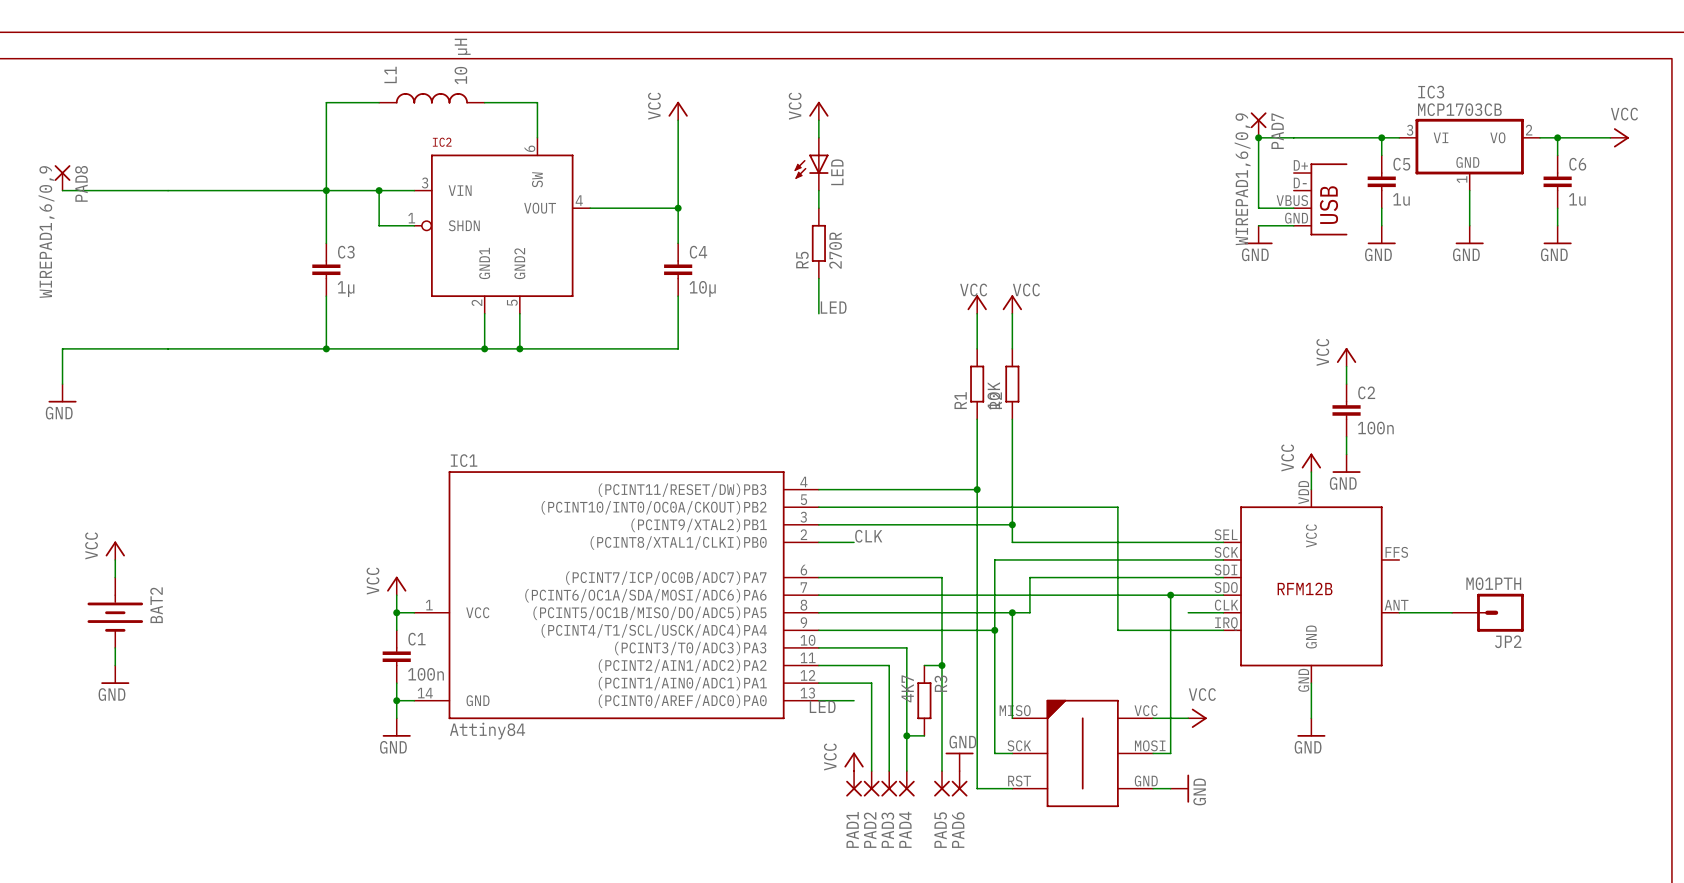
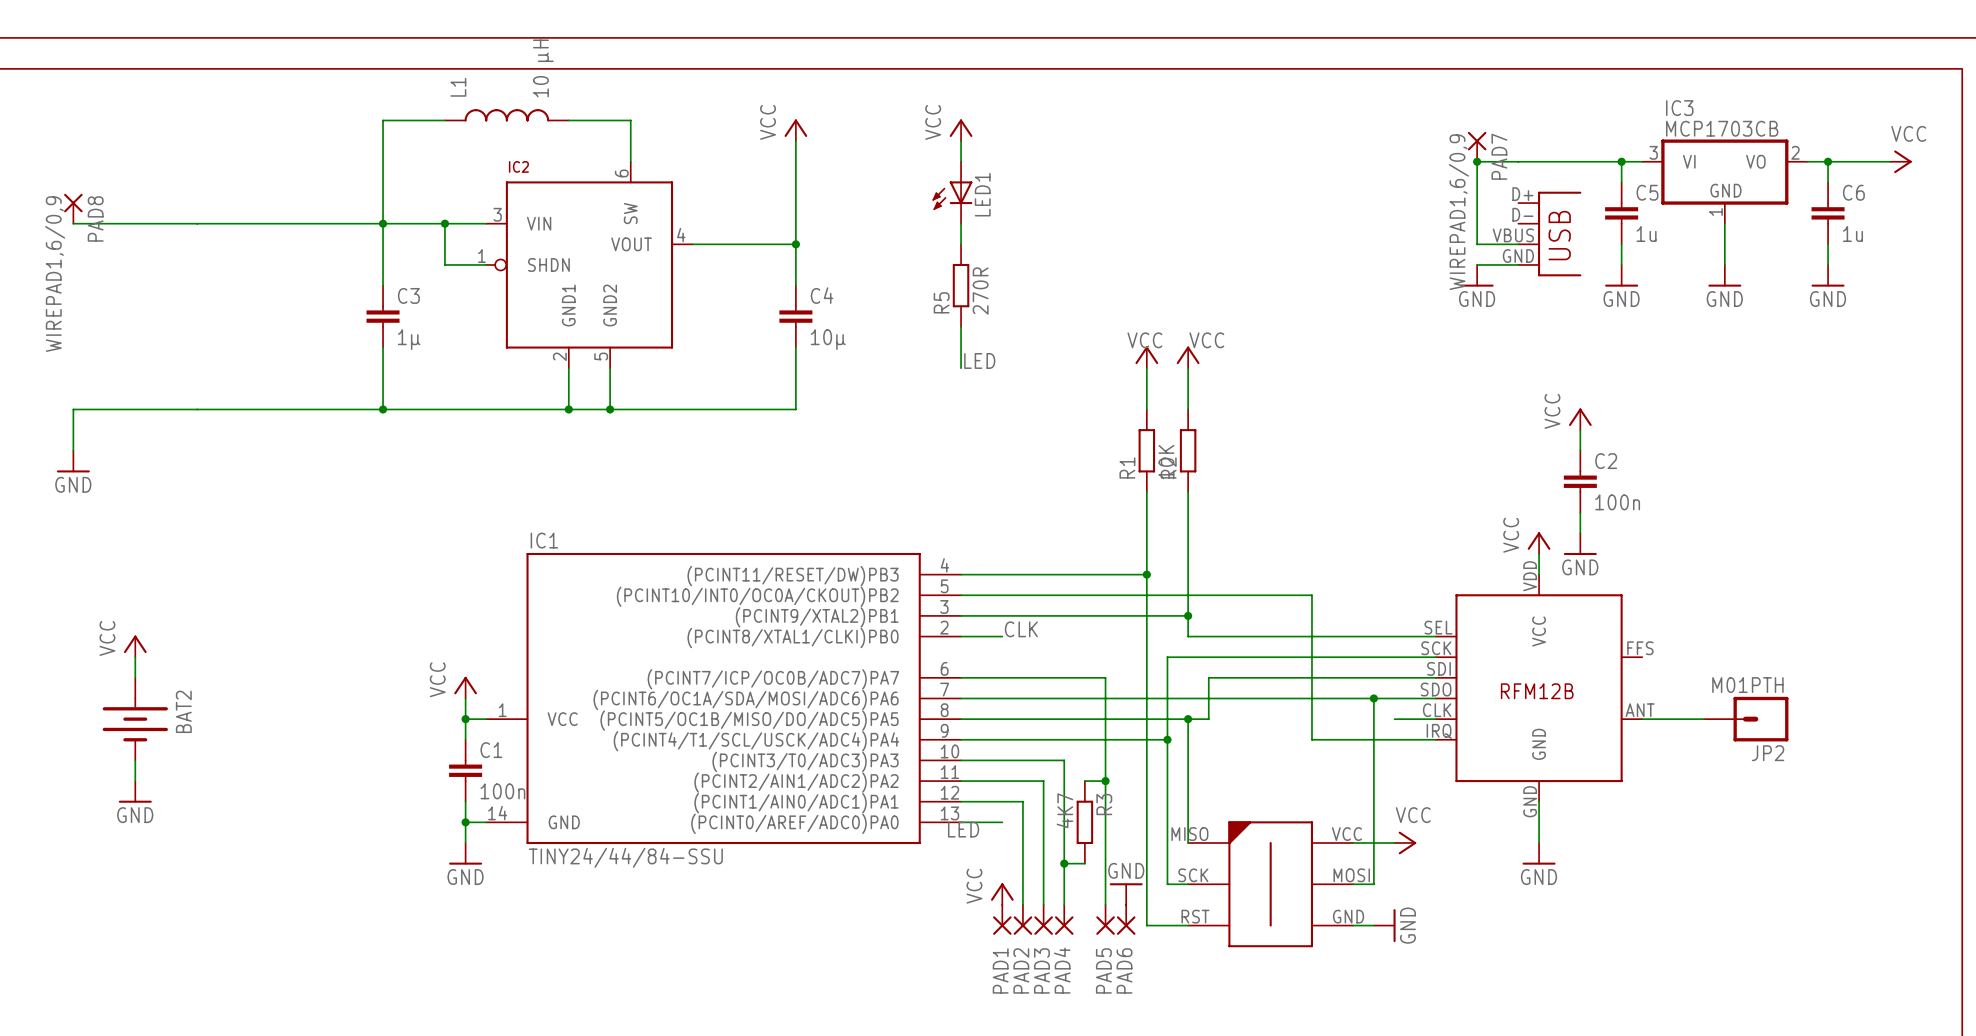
LED name: LED (837, 172) -> LED1 (982, 194)
IC1 value: Attiny84 (487, 731) -> TINY24/44/84-SSU (625, 857)

